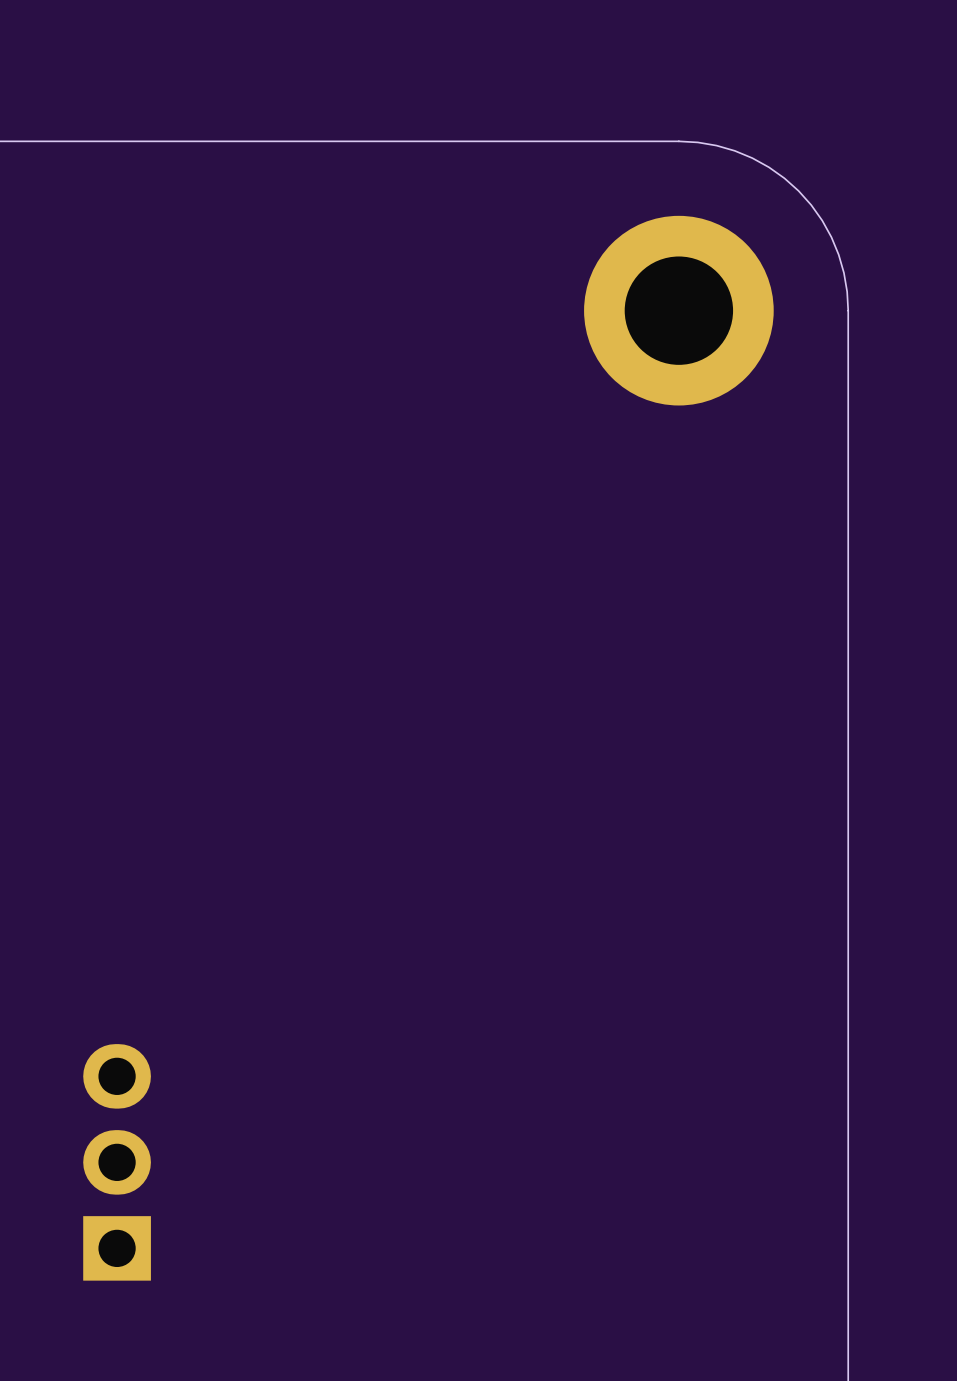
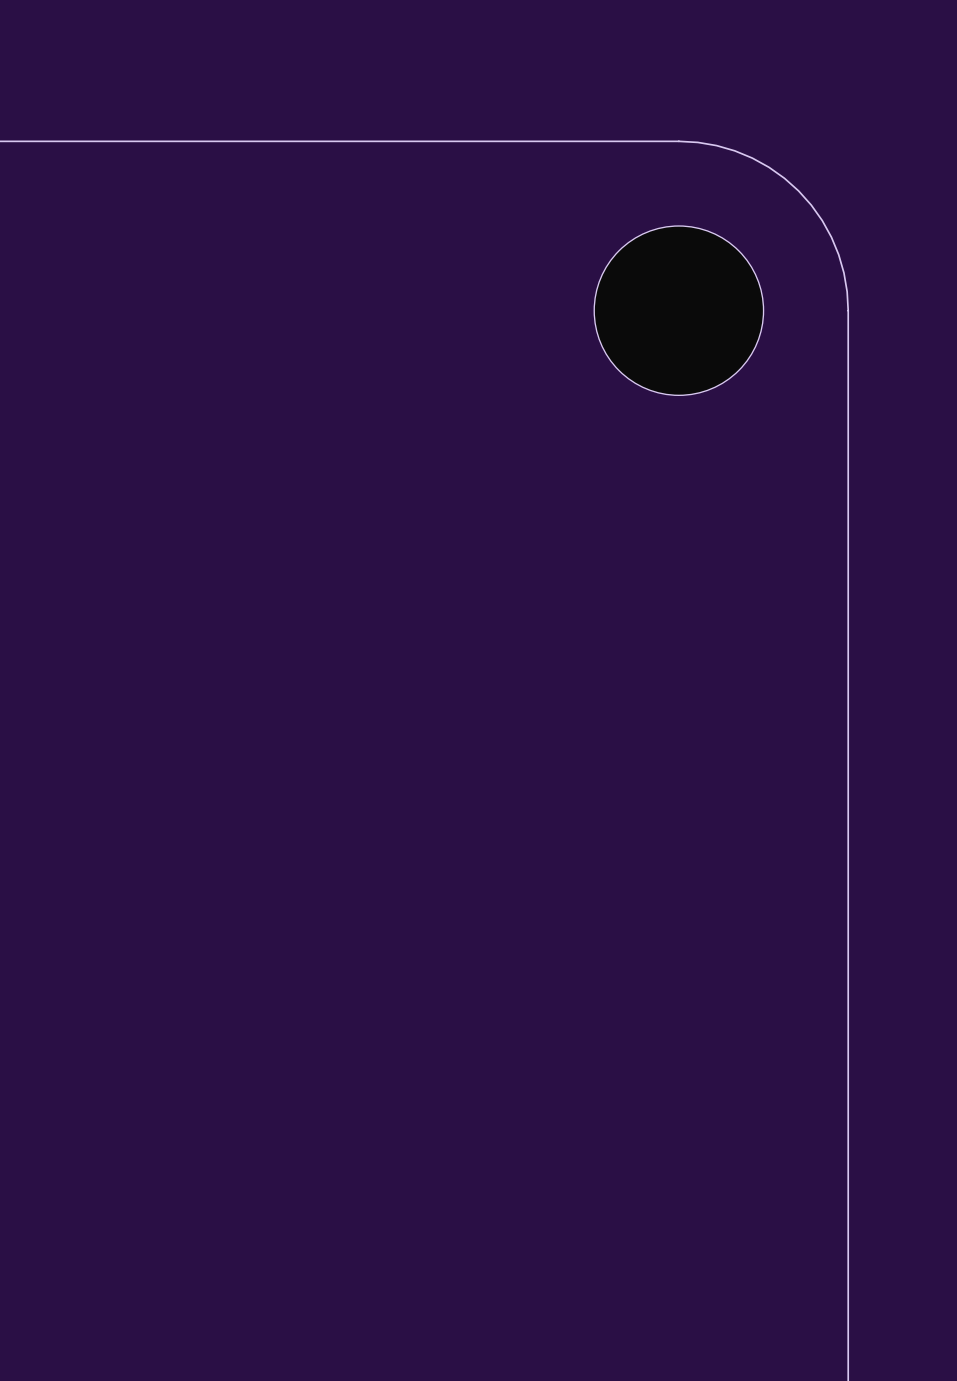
part footprint: [584, 215, 774, 406] -> [594, 226, 764, 396]
part: (117, 1162) -> none

